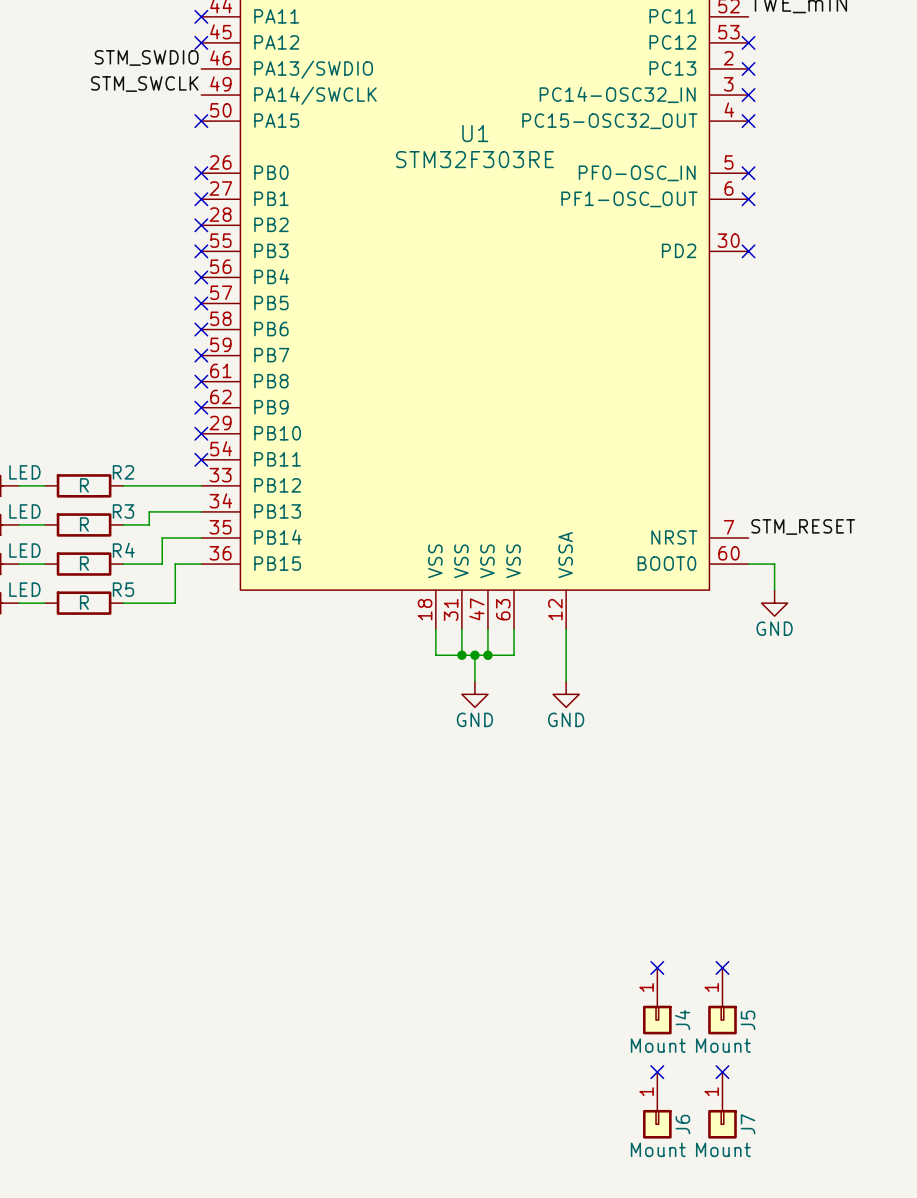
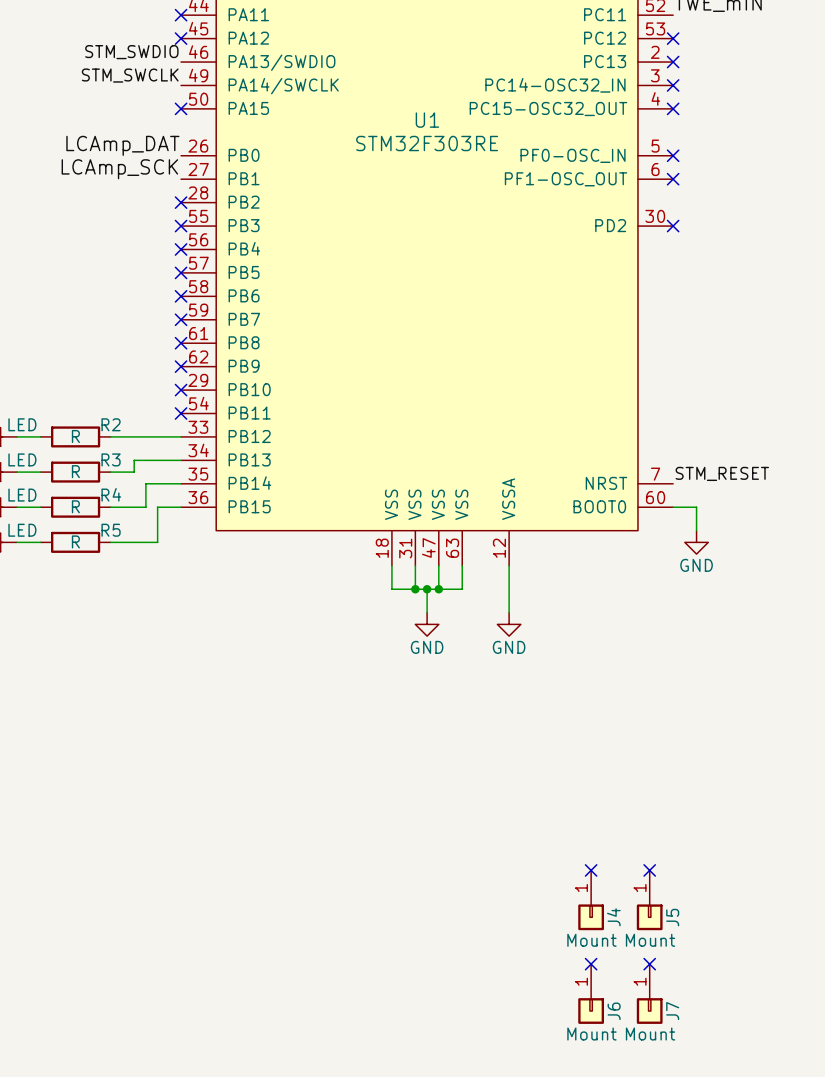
label: none -> LCAmp_DAT (122, 145)
no-connect mark: (201, 173) -> none
label: none -> LCAmp_SCK (119, 169)
no-connect mark: (201, 199) -> none

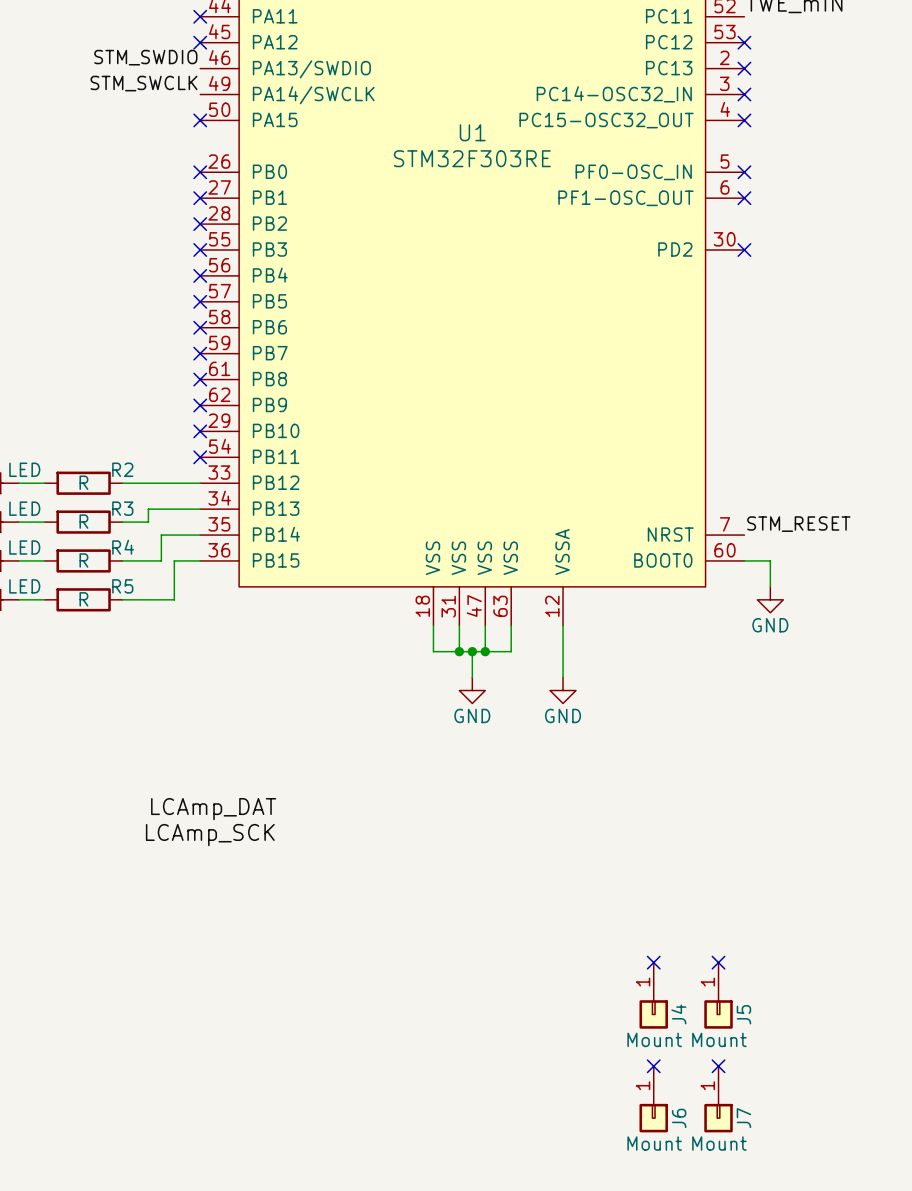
label: LCAmp_DAT (122, 145) -> none
no-connect mark: none -> (200, 172)
label: LCAmp_SCK (119, 169) -> none
no-connect mark: none -> (200, 198)
label: none -> LCAmp_DAT (213, 809)
label: none -> LCAmp_SCK (210, 835)

